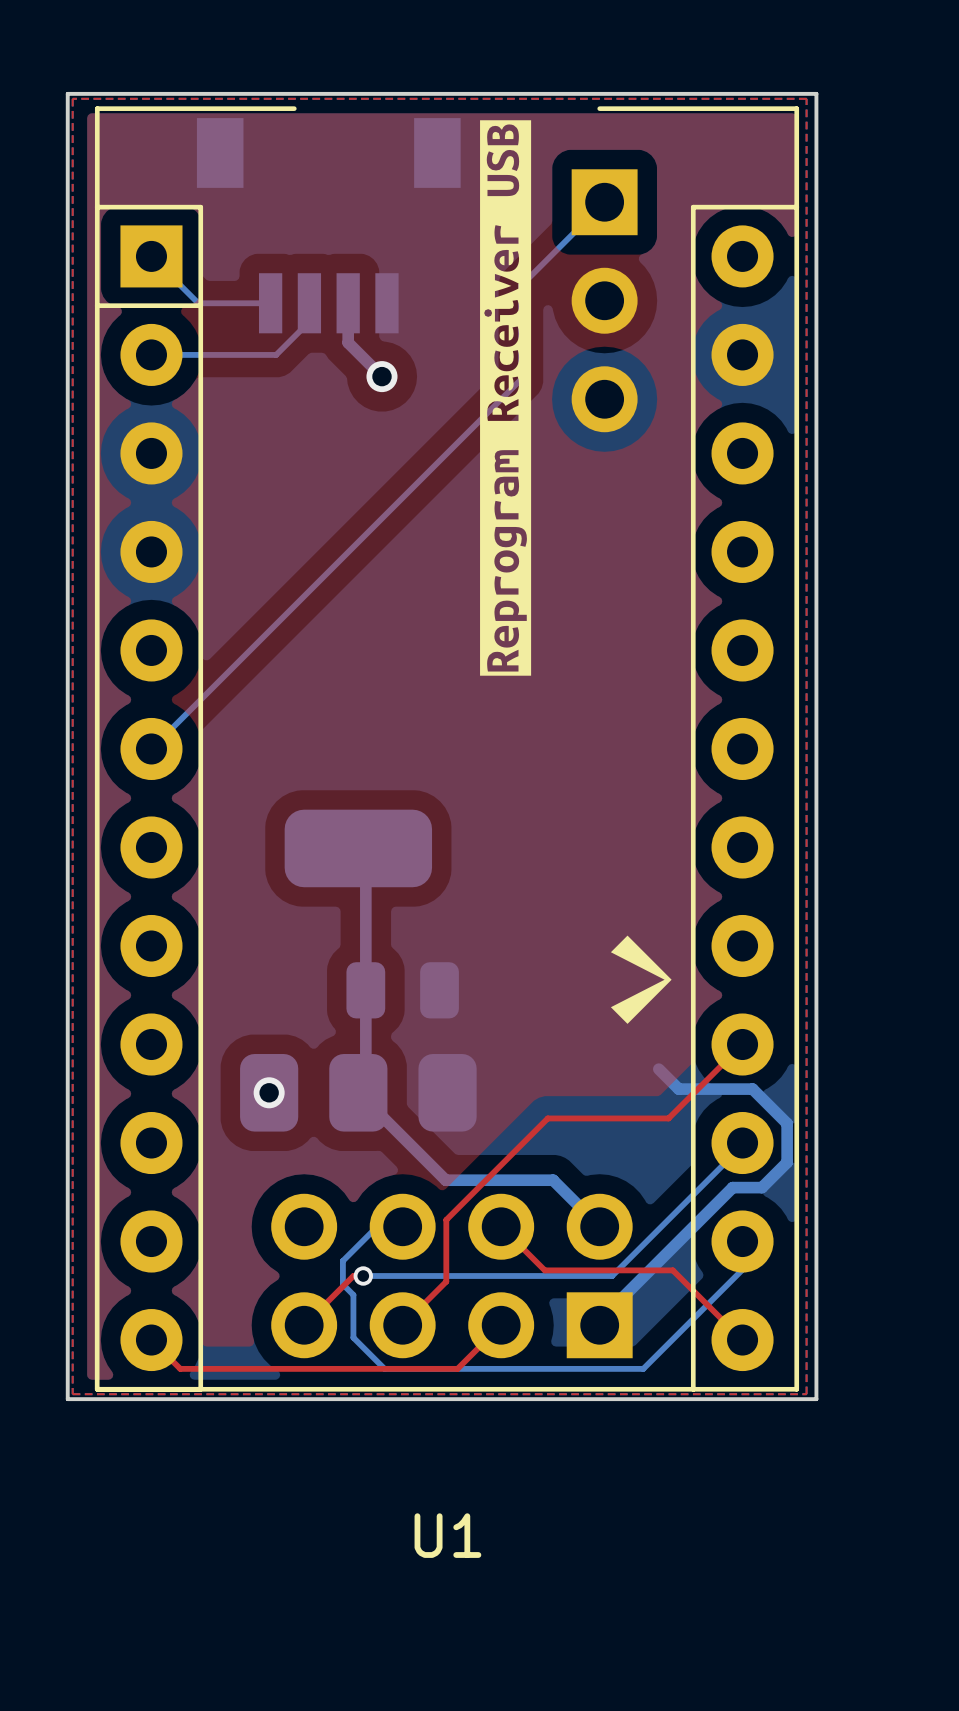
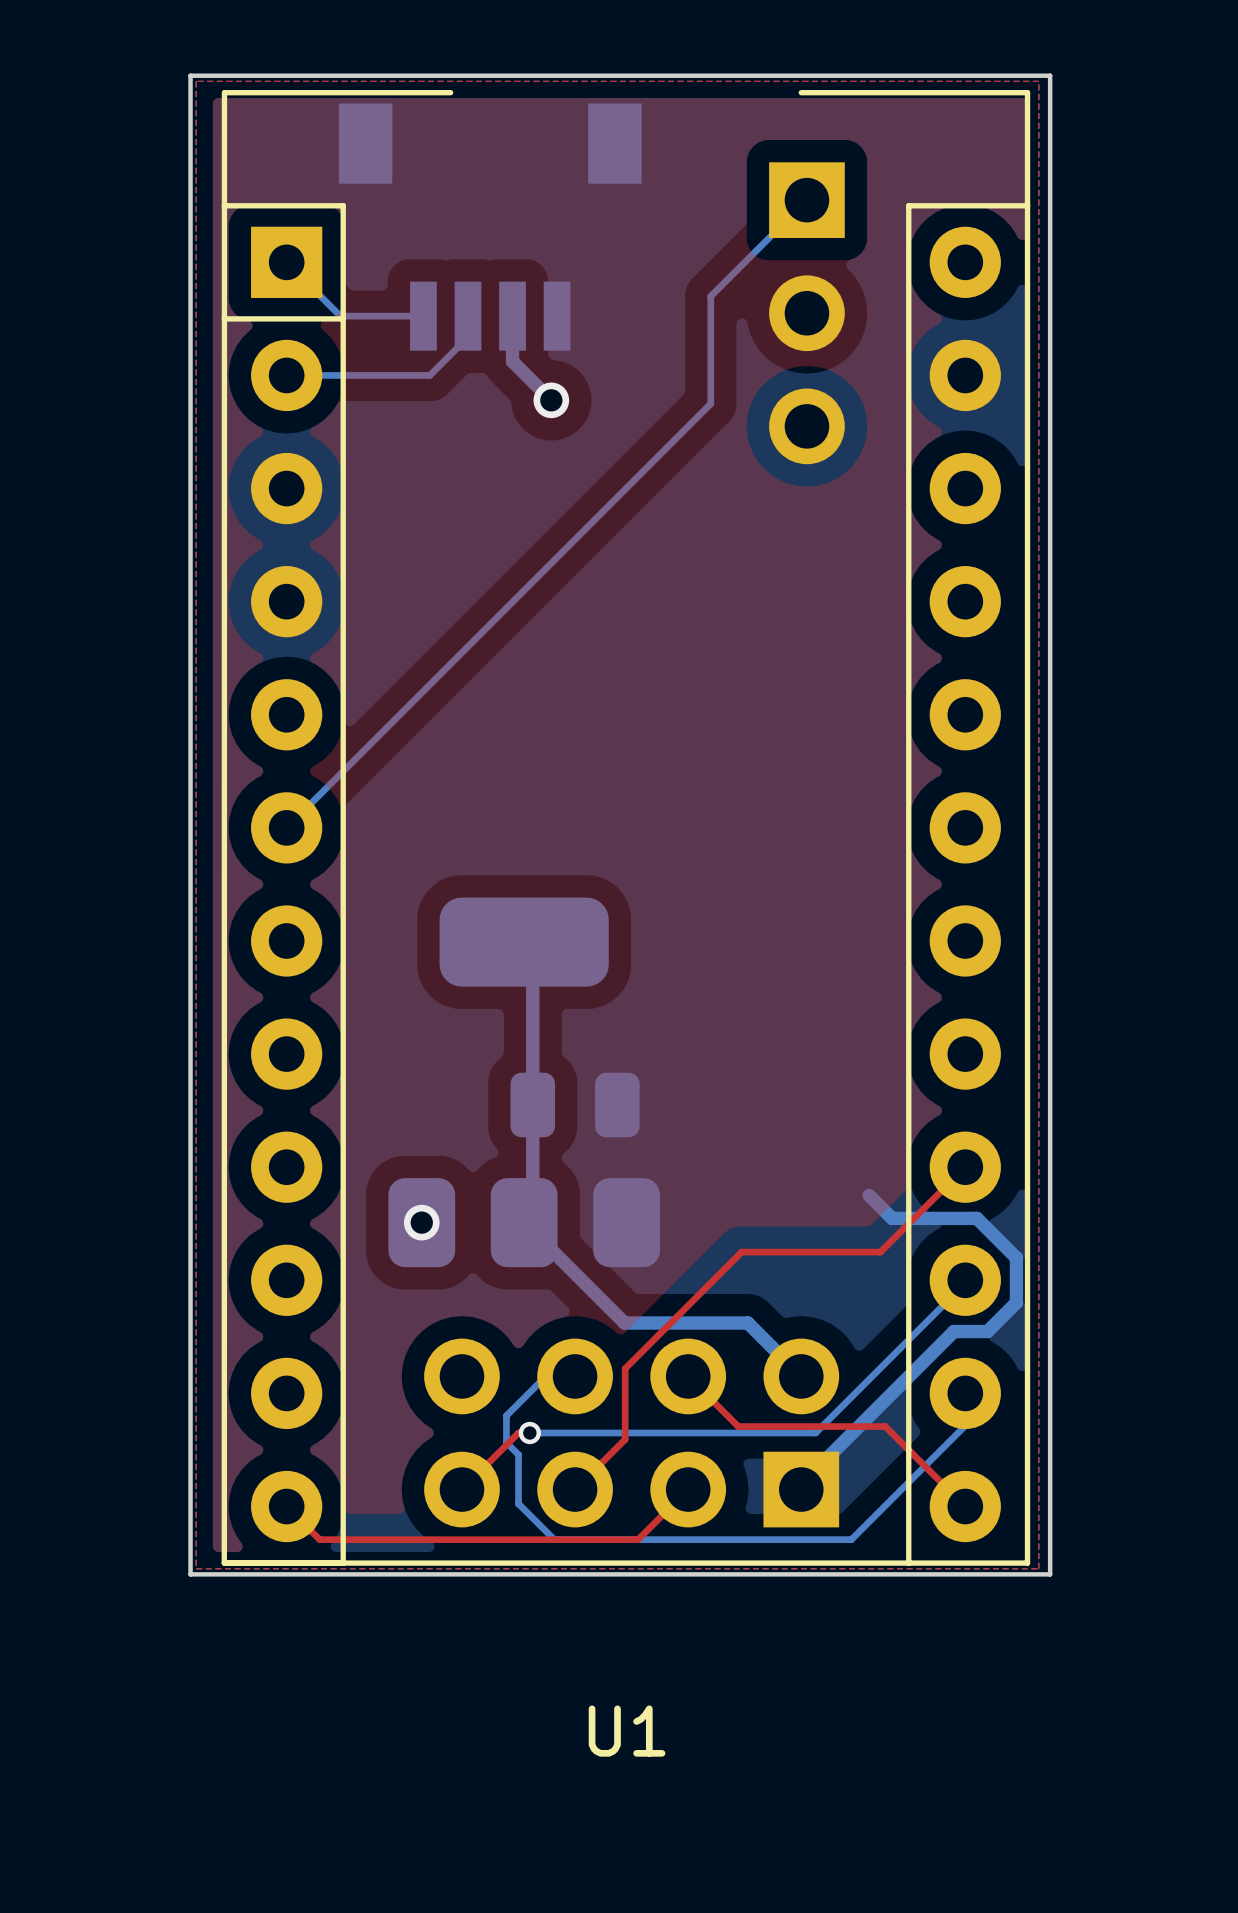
drawing: [480, 120, 532, 676] -> none
drawing: [610, 935, 672, 1024] -> none

